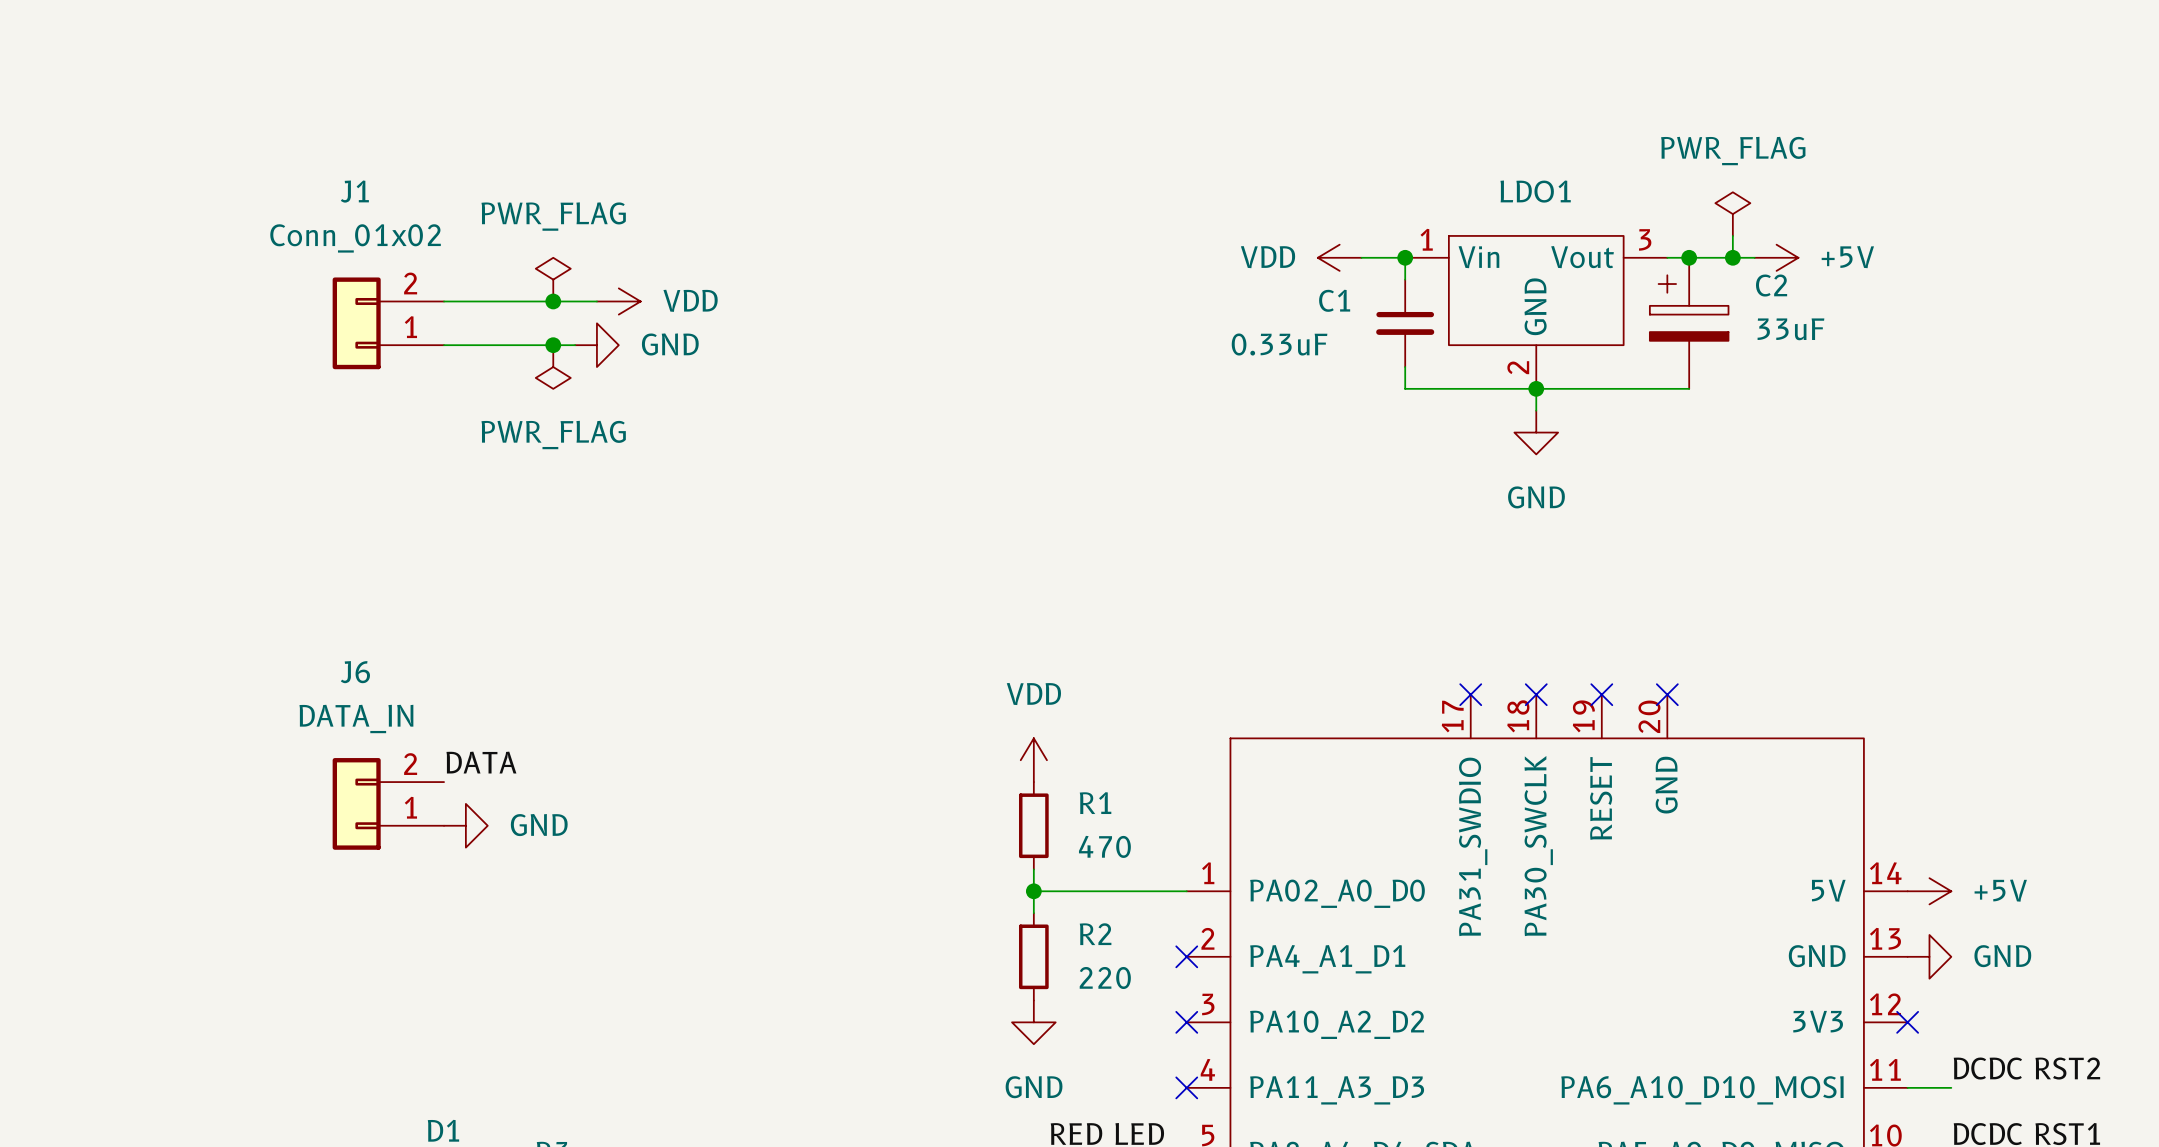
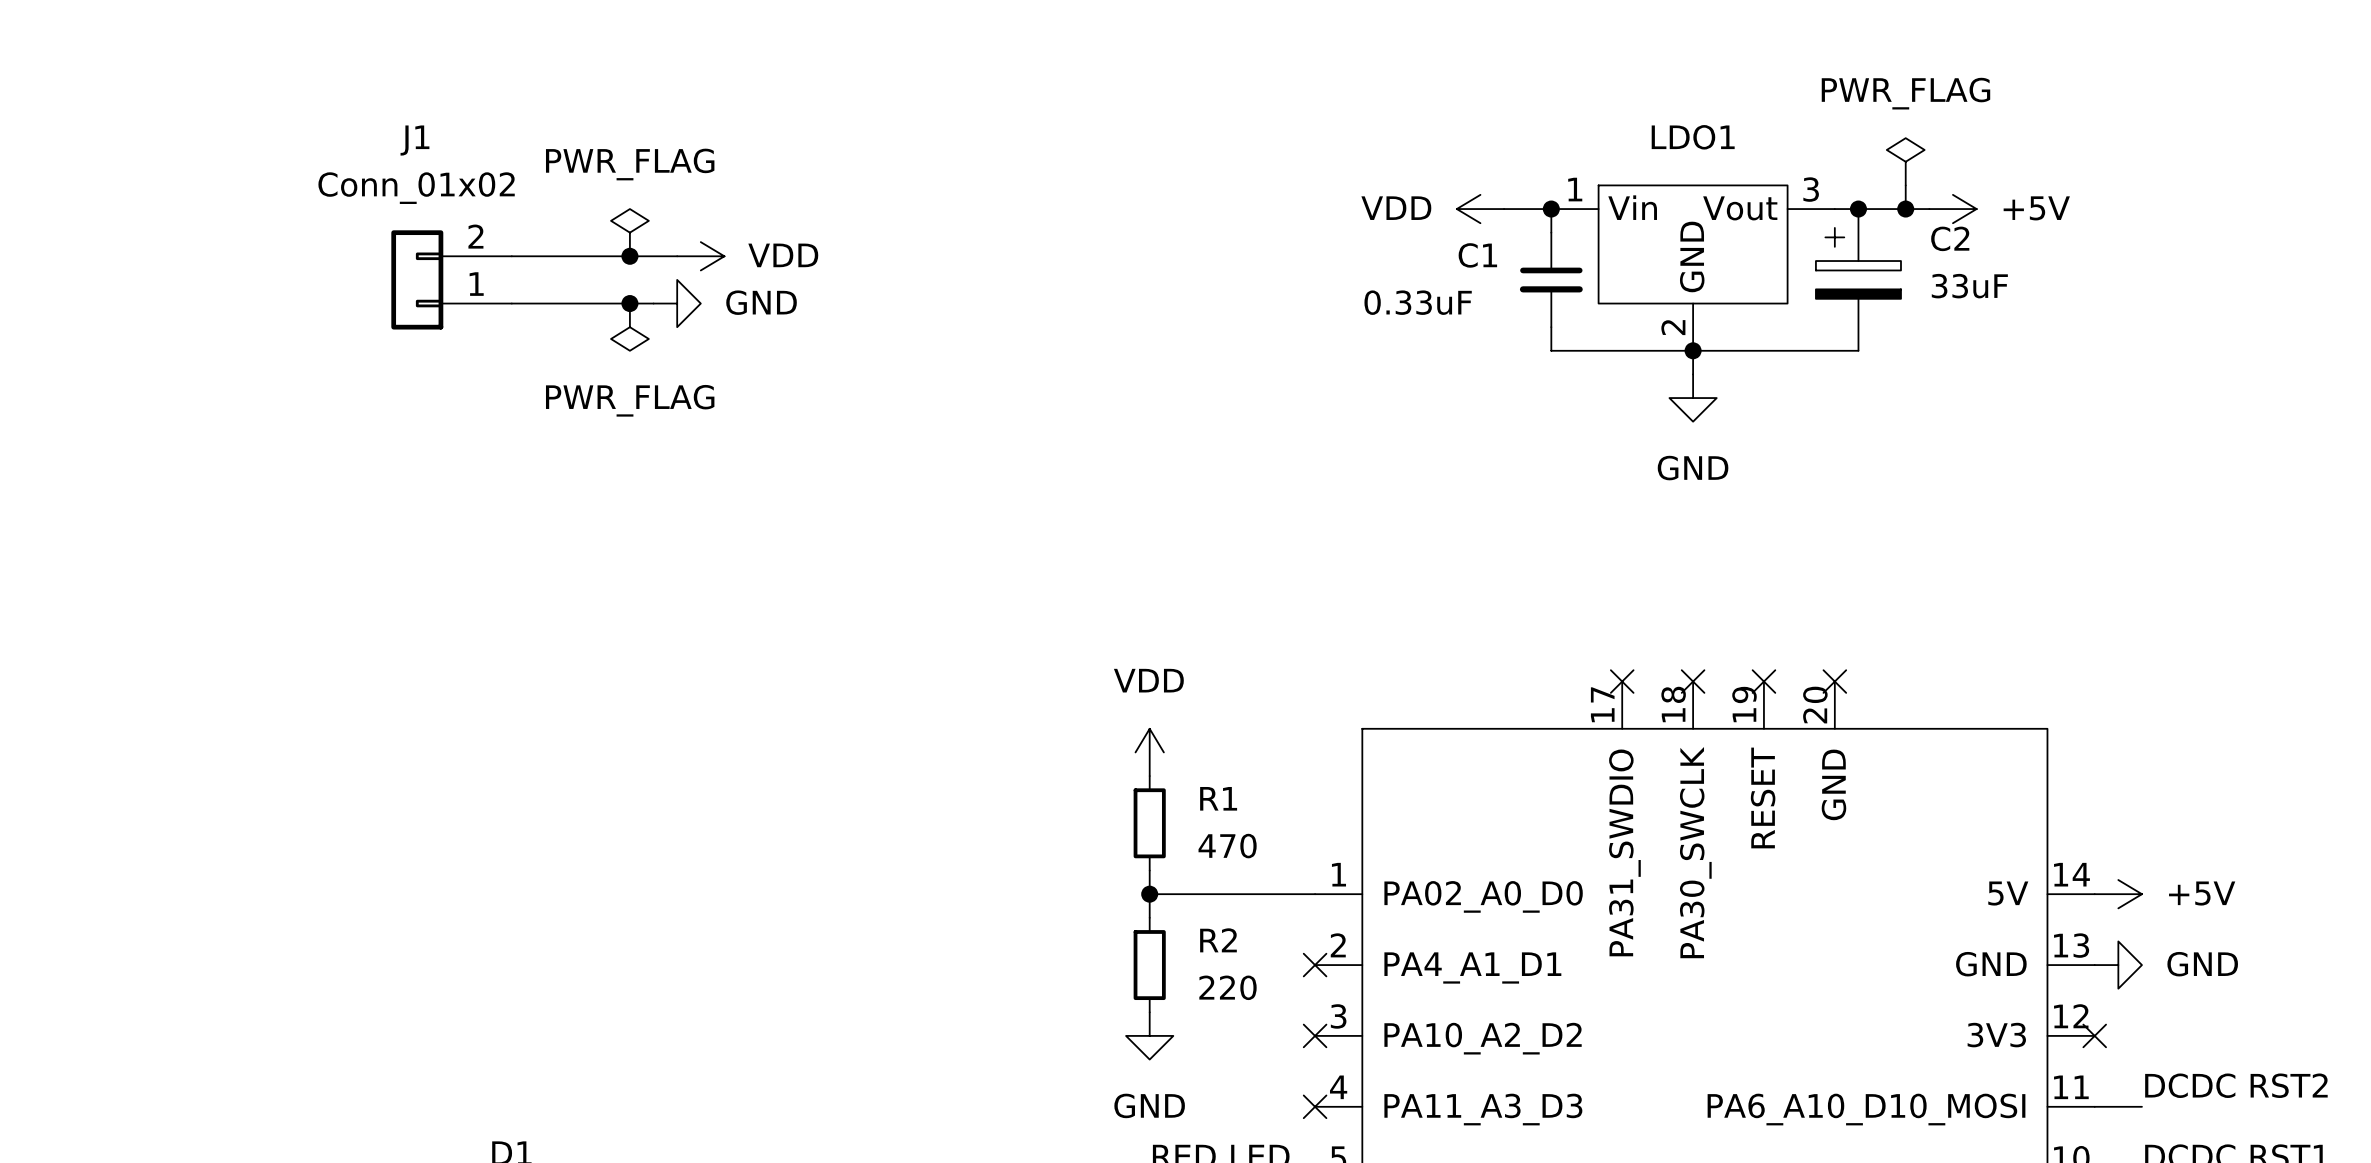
label: DATA (481, 762) -> none
J6: DATA_IN (388, 803) -> none
power symbol: GND (465, 825) -> none

